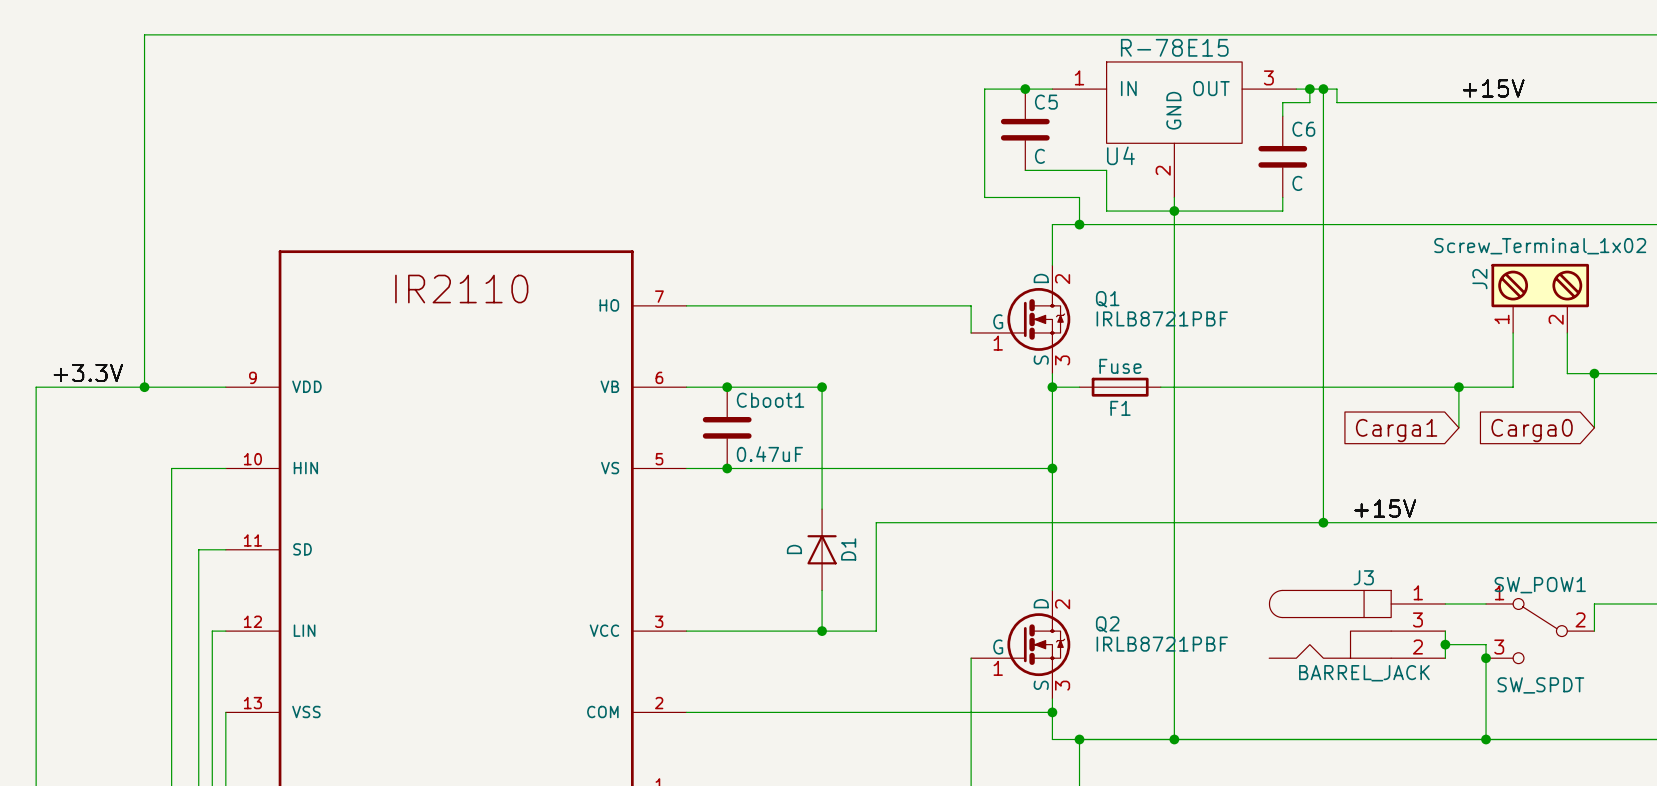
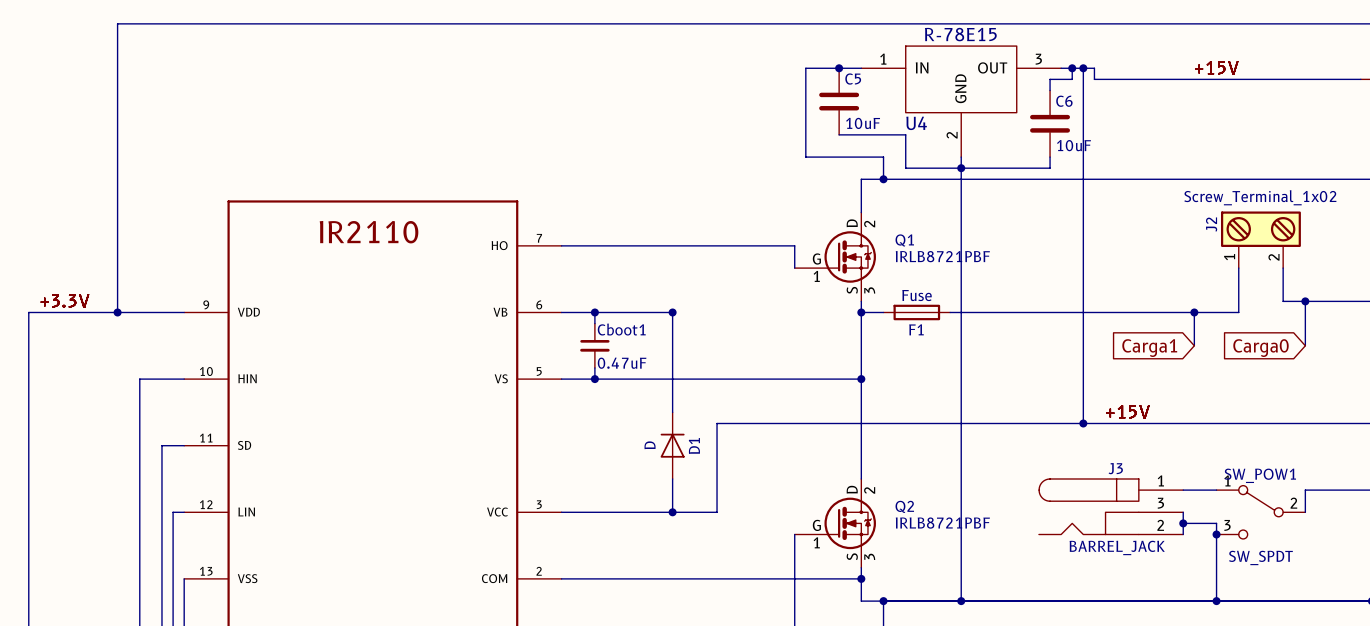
C5 value: C (1039, 156) -> 10uF (863, 123)
C6 value: C (1297, 183) -> 10uF (1074, 145)
Cboot1 symbol: [702, 387, 752, 469] -> [580, 323, 610, 368]

